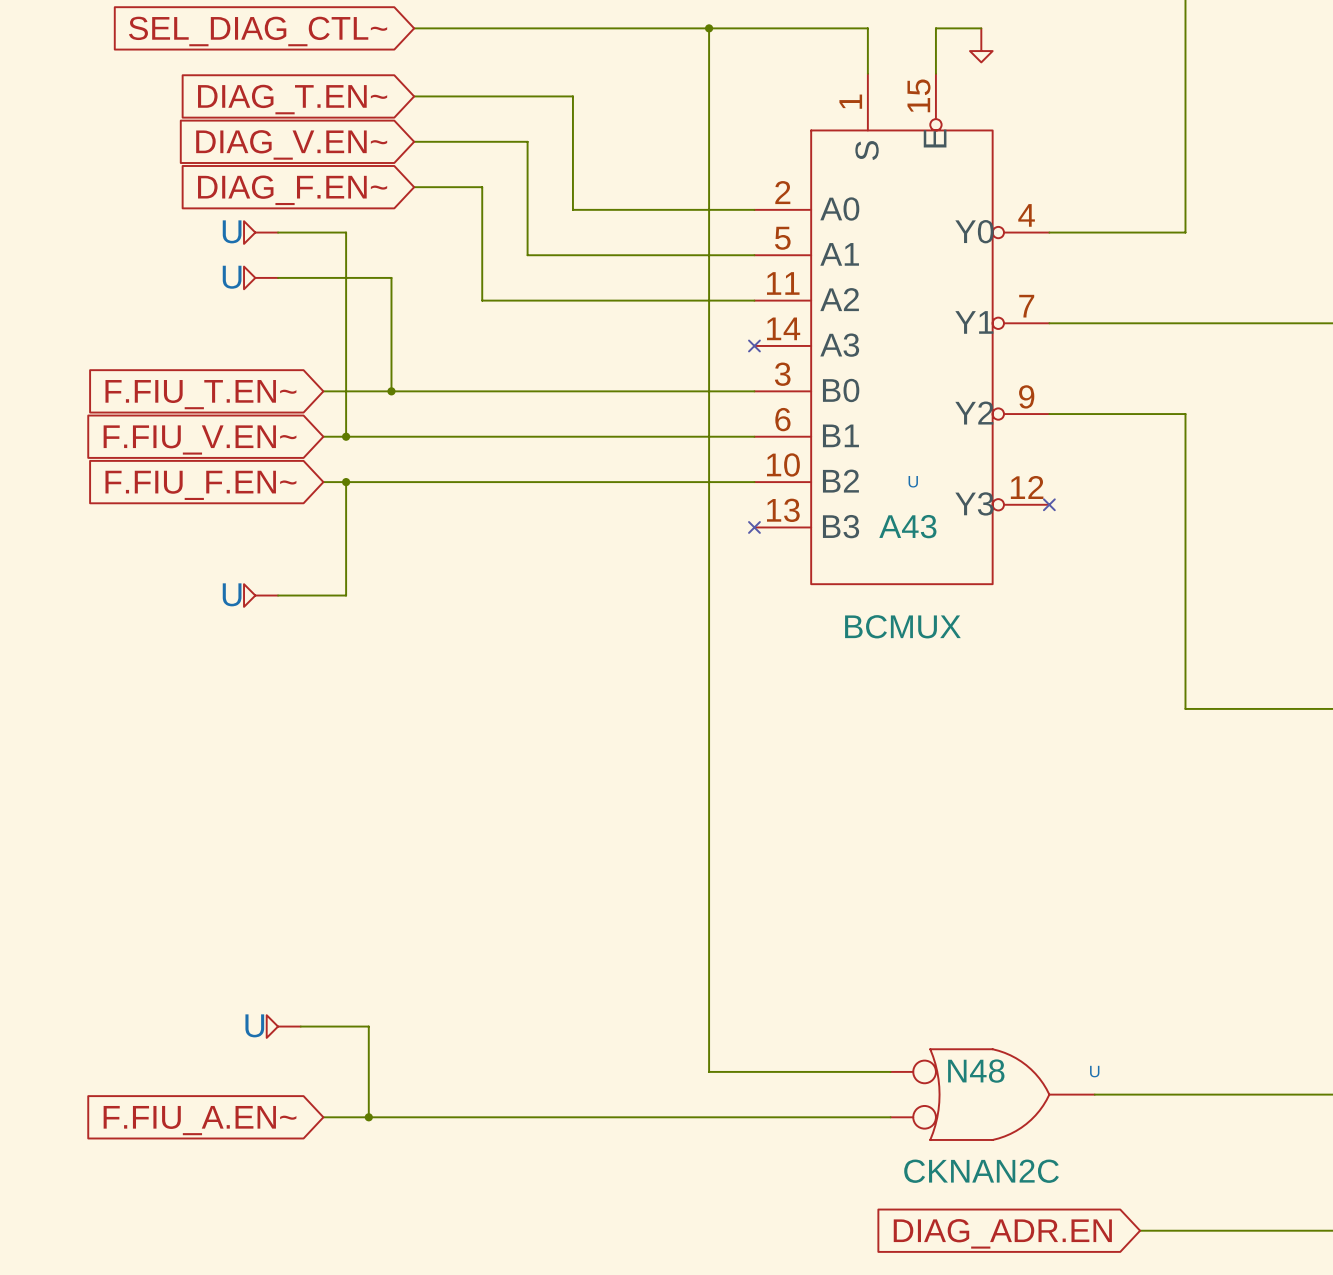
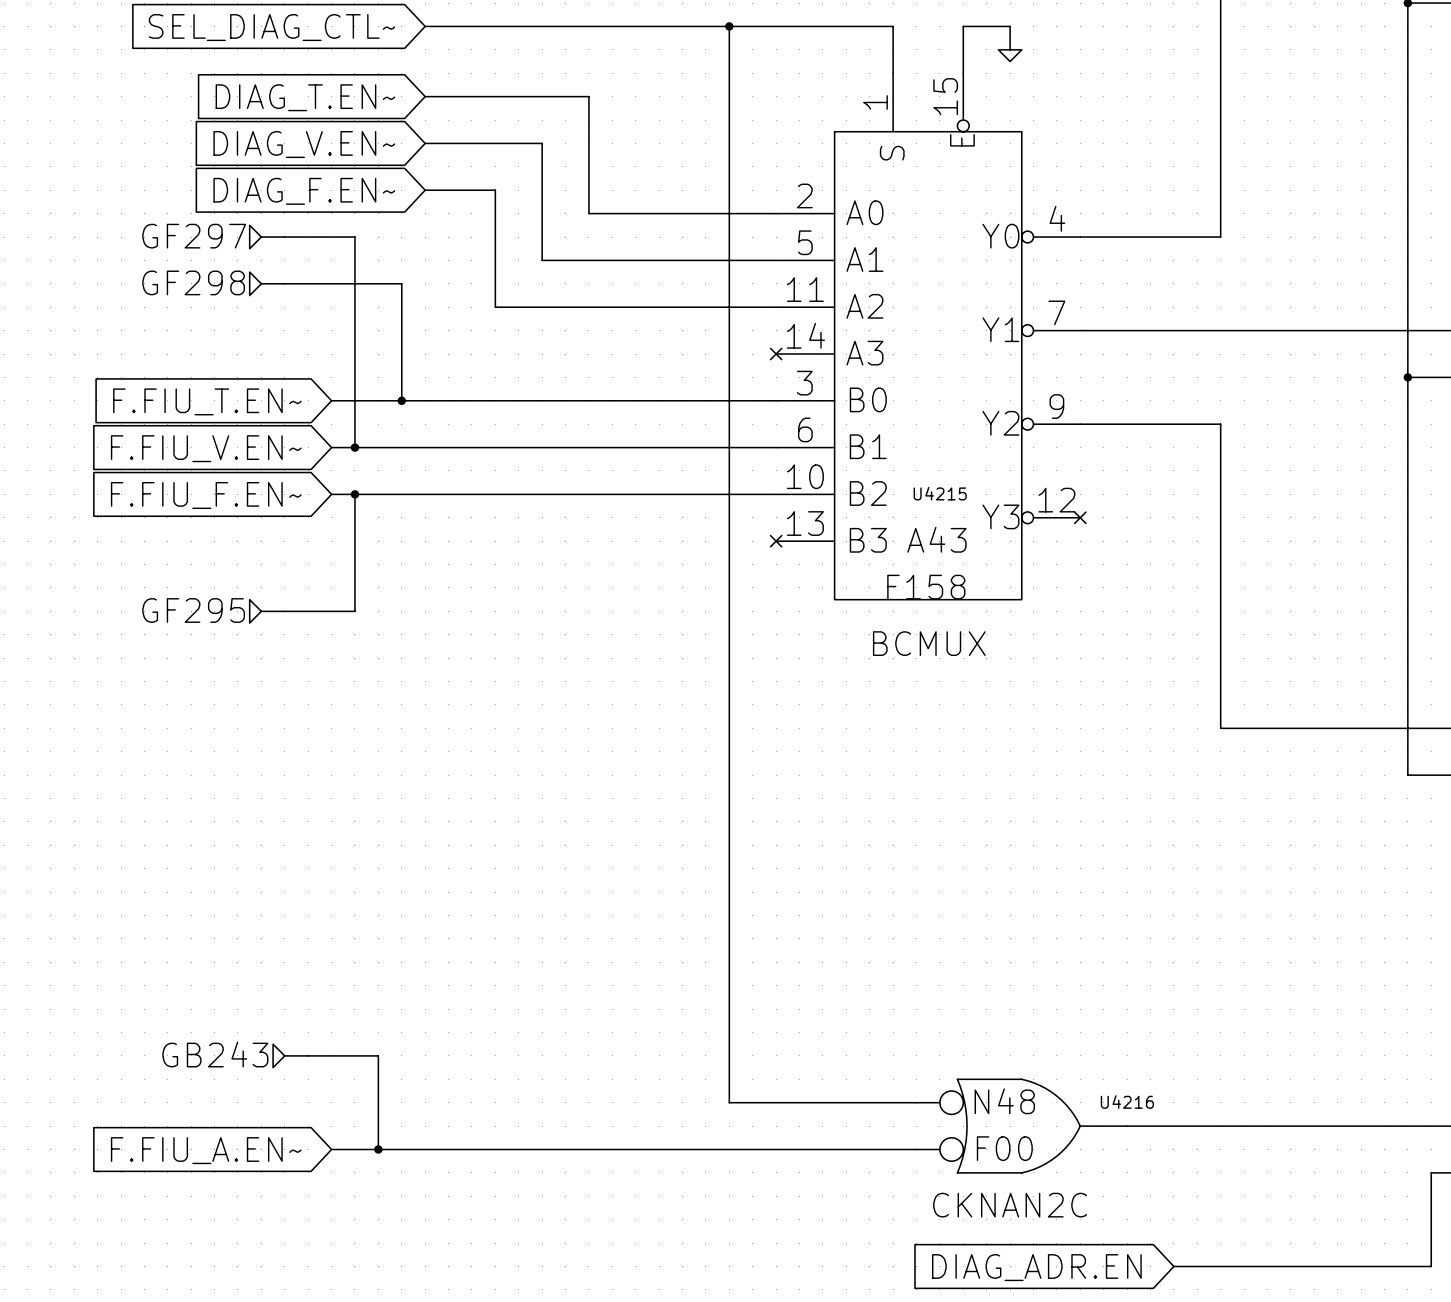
U name: U (232, 231) -> GF297 (194, 236)
U name: U (232, 277) -> GF298 (193, 282)
U name: U (913, 481) -> U4215 (940, 493)
U value: none -> F158 (926, 587)
U name: U (232, 594) -> GF295 (193, 610)
U name: U (254, 1025) -> GB243 (215, 1054)
U name: U (1094, 1071) -> U4216 (1127, 1101)
U value: none -> F00 (1004, 1148)

